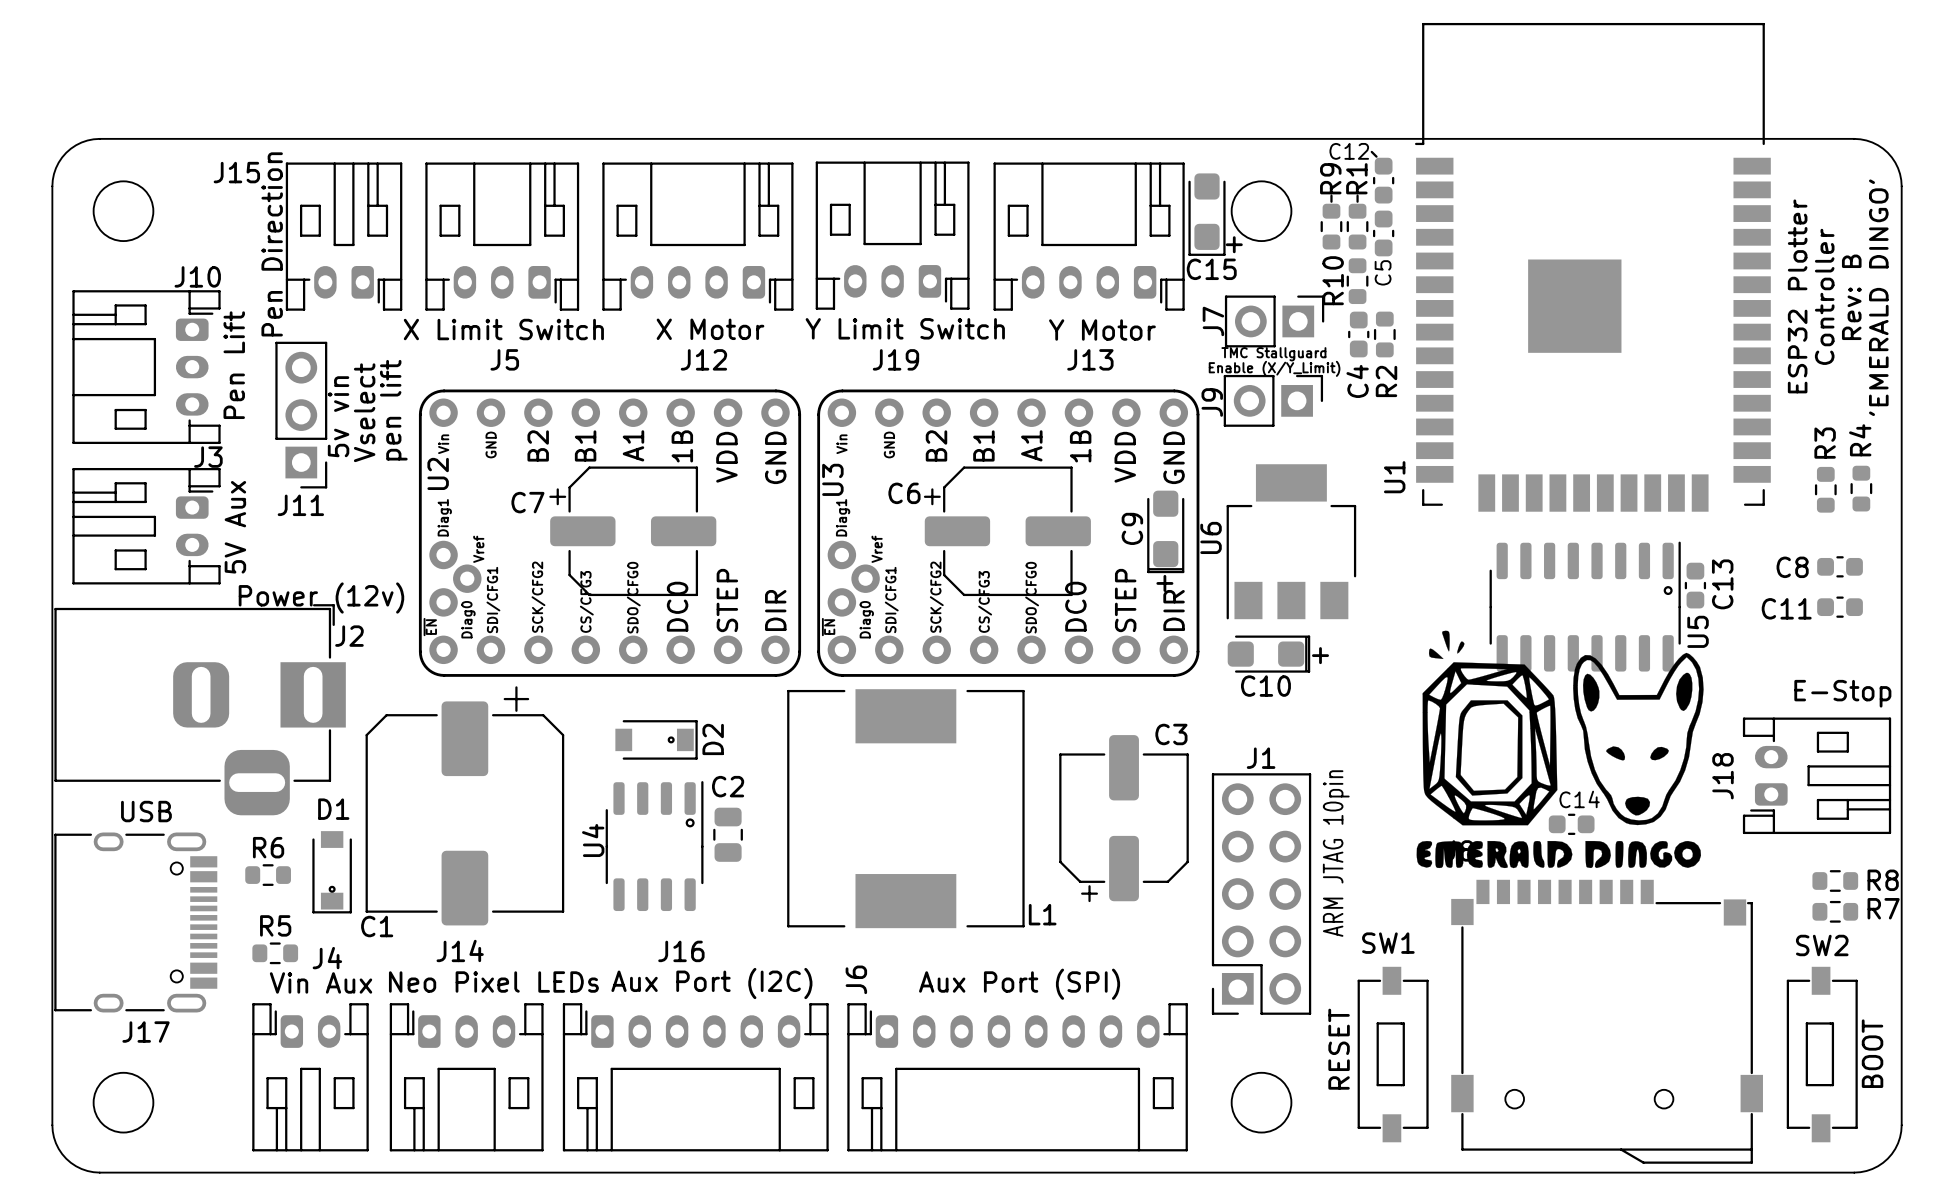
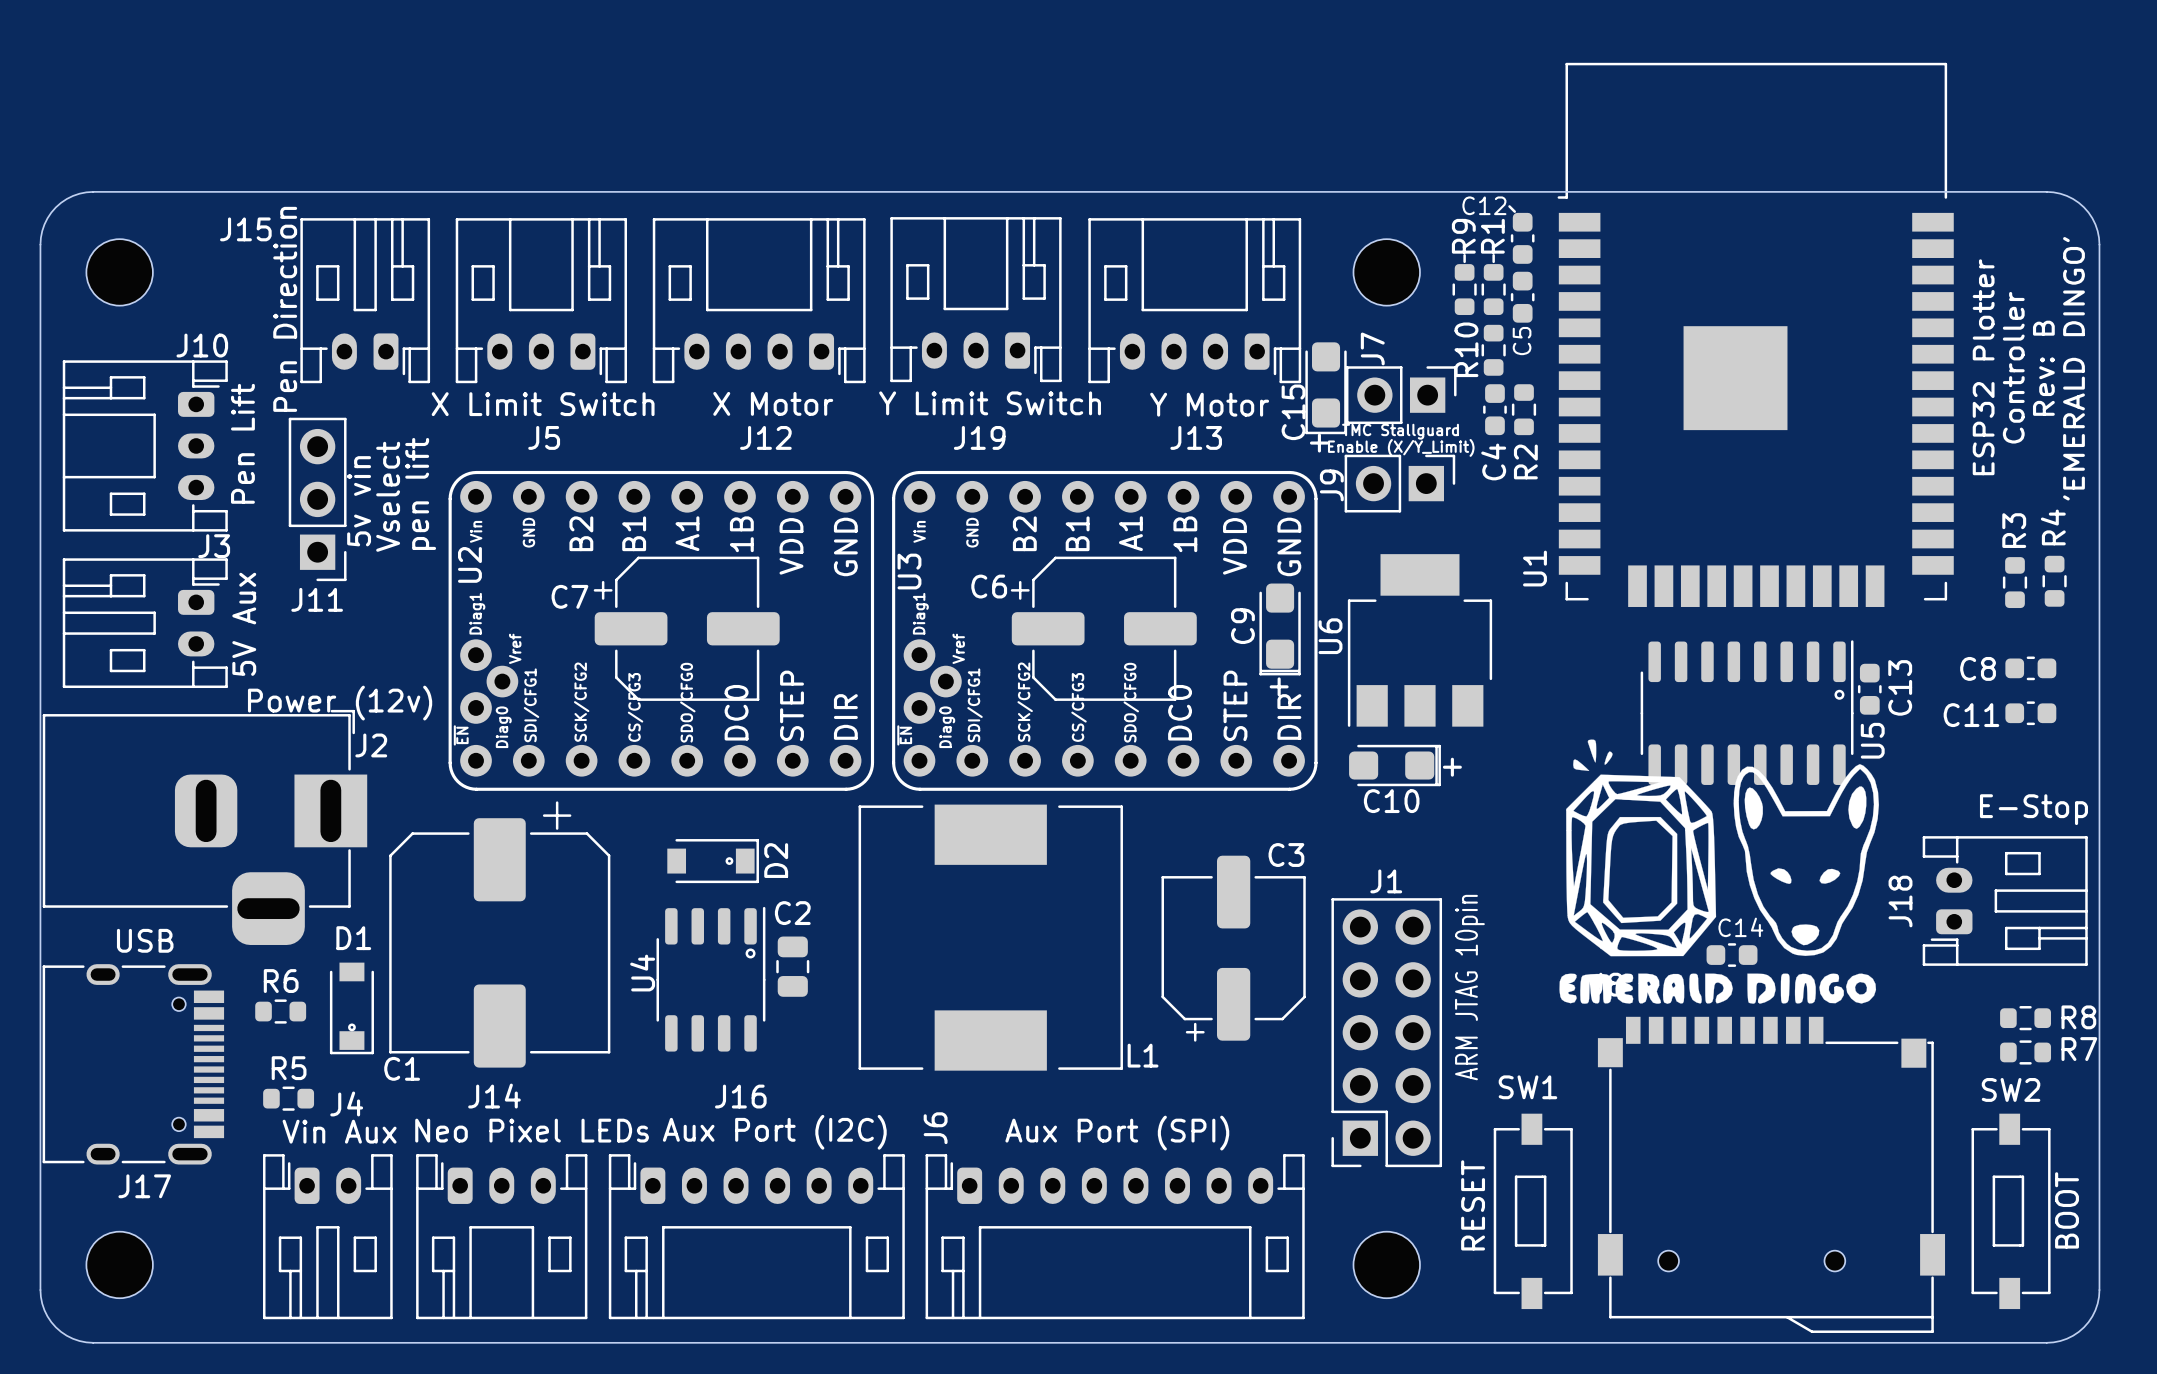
C15 position: (1207, 214) -> (1326, 388)
text position: + (1234, 244) -> + (1319, 443)
C15 name rotation: 0° (1211, 269) -> 90° counterclockwise (1293, 412)
J7 name position: J7 (1213, 321) -> J7 (1372, 348)

